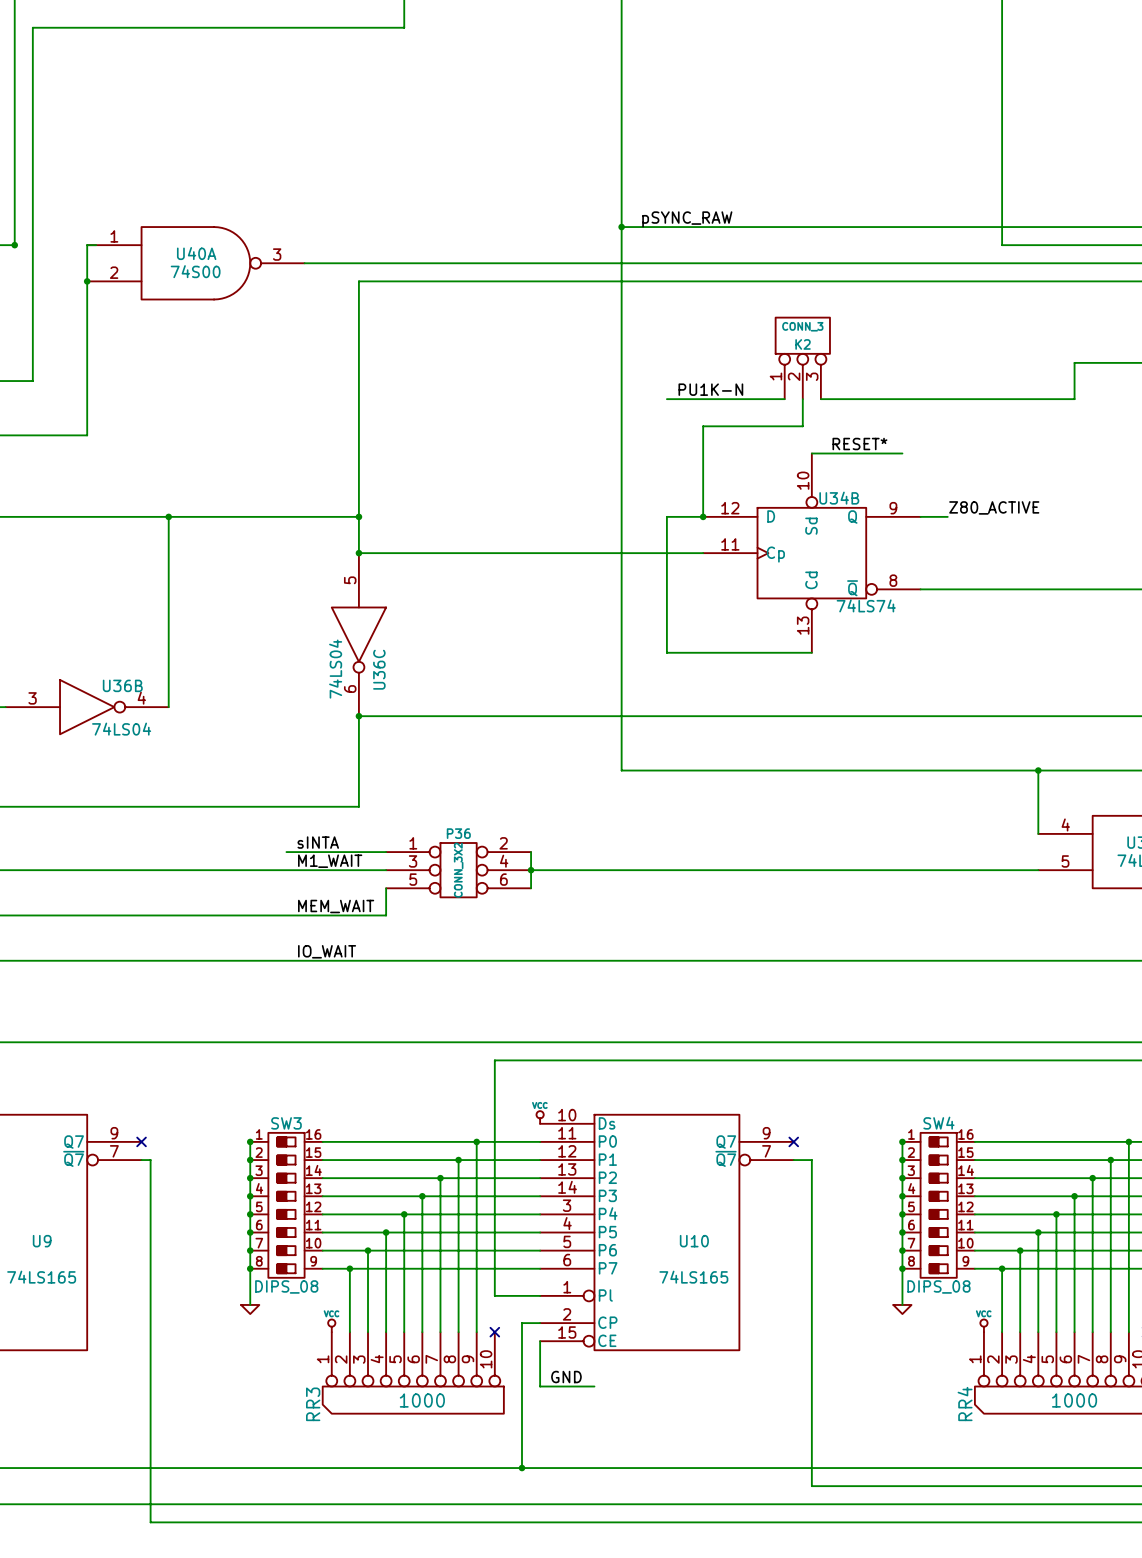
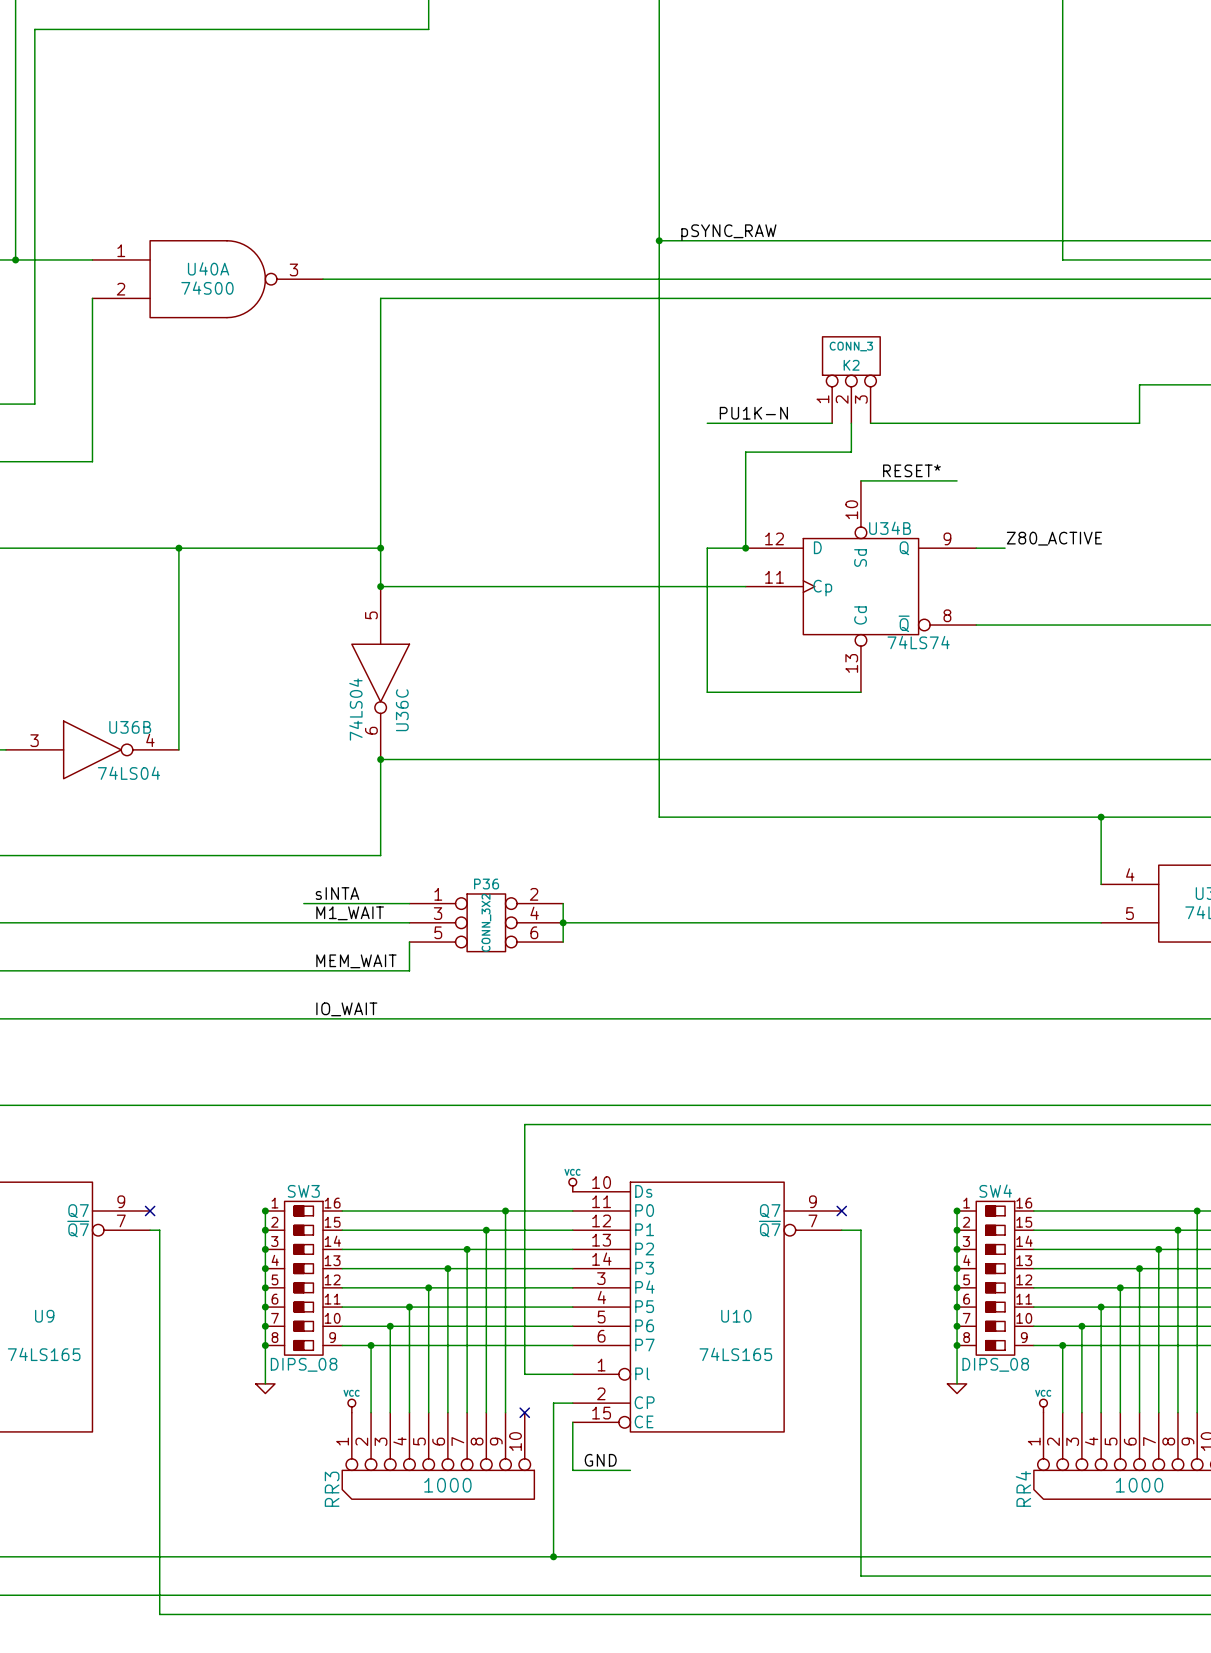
wire: none -> (15, 259) (92, 259)
wire: (96, 245) (87, 245) (87, 281) -> none
junction: (87, 281) -> none

